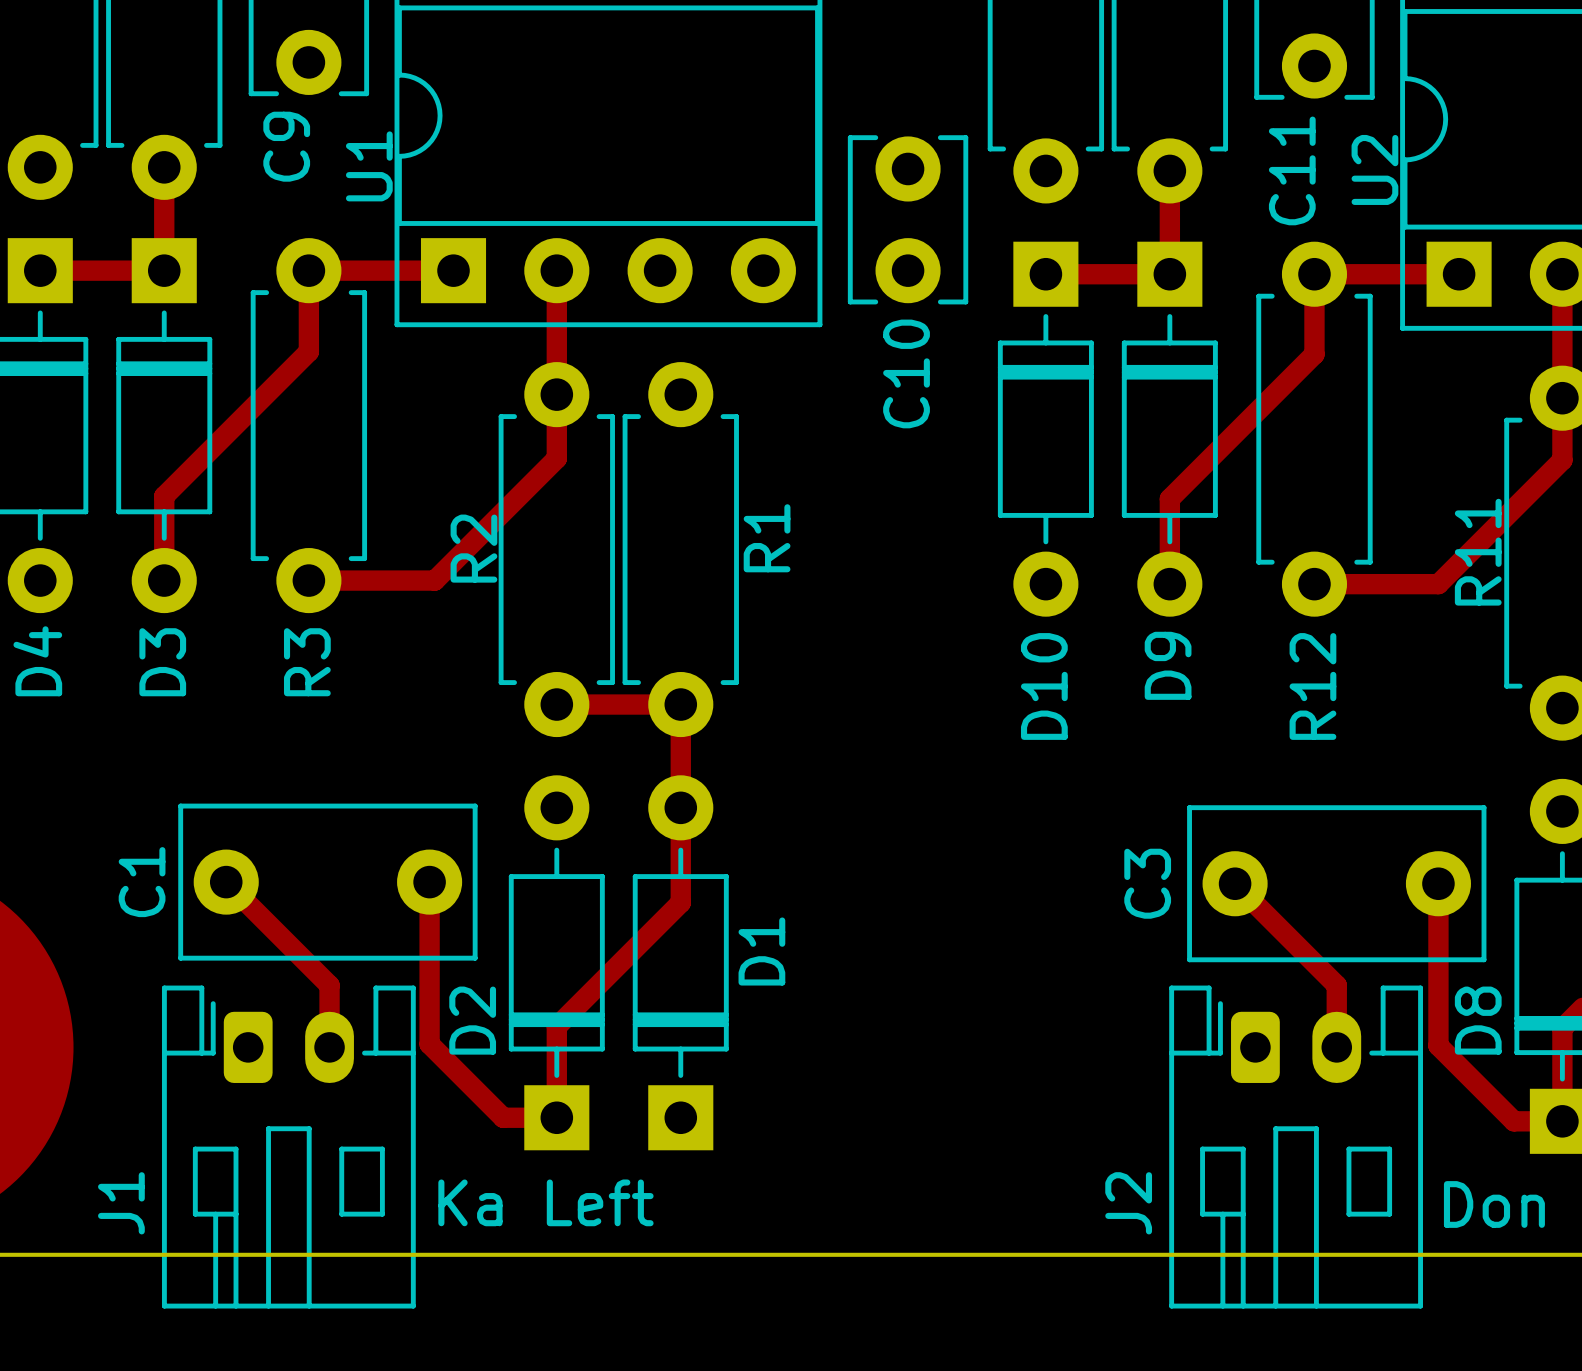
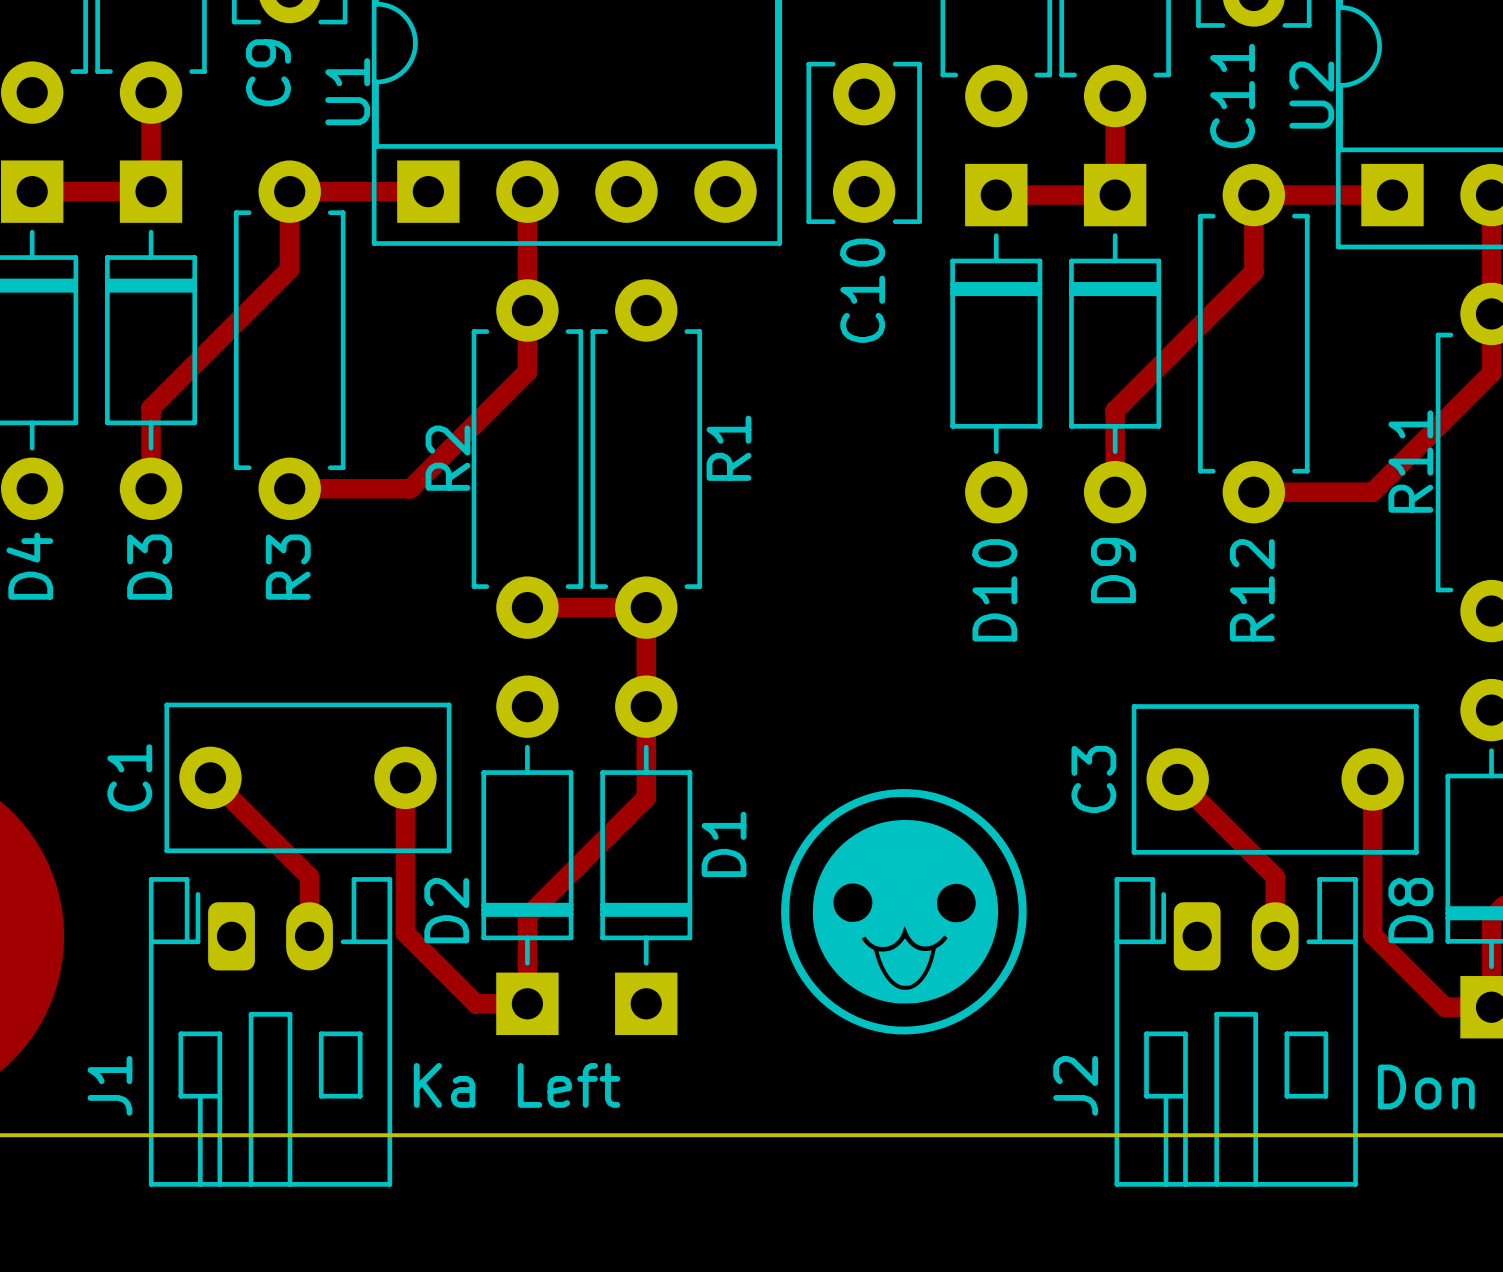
drawing: none -> [781, 789, 1027, 1035]

